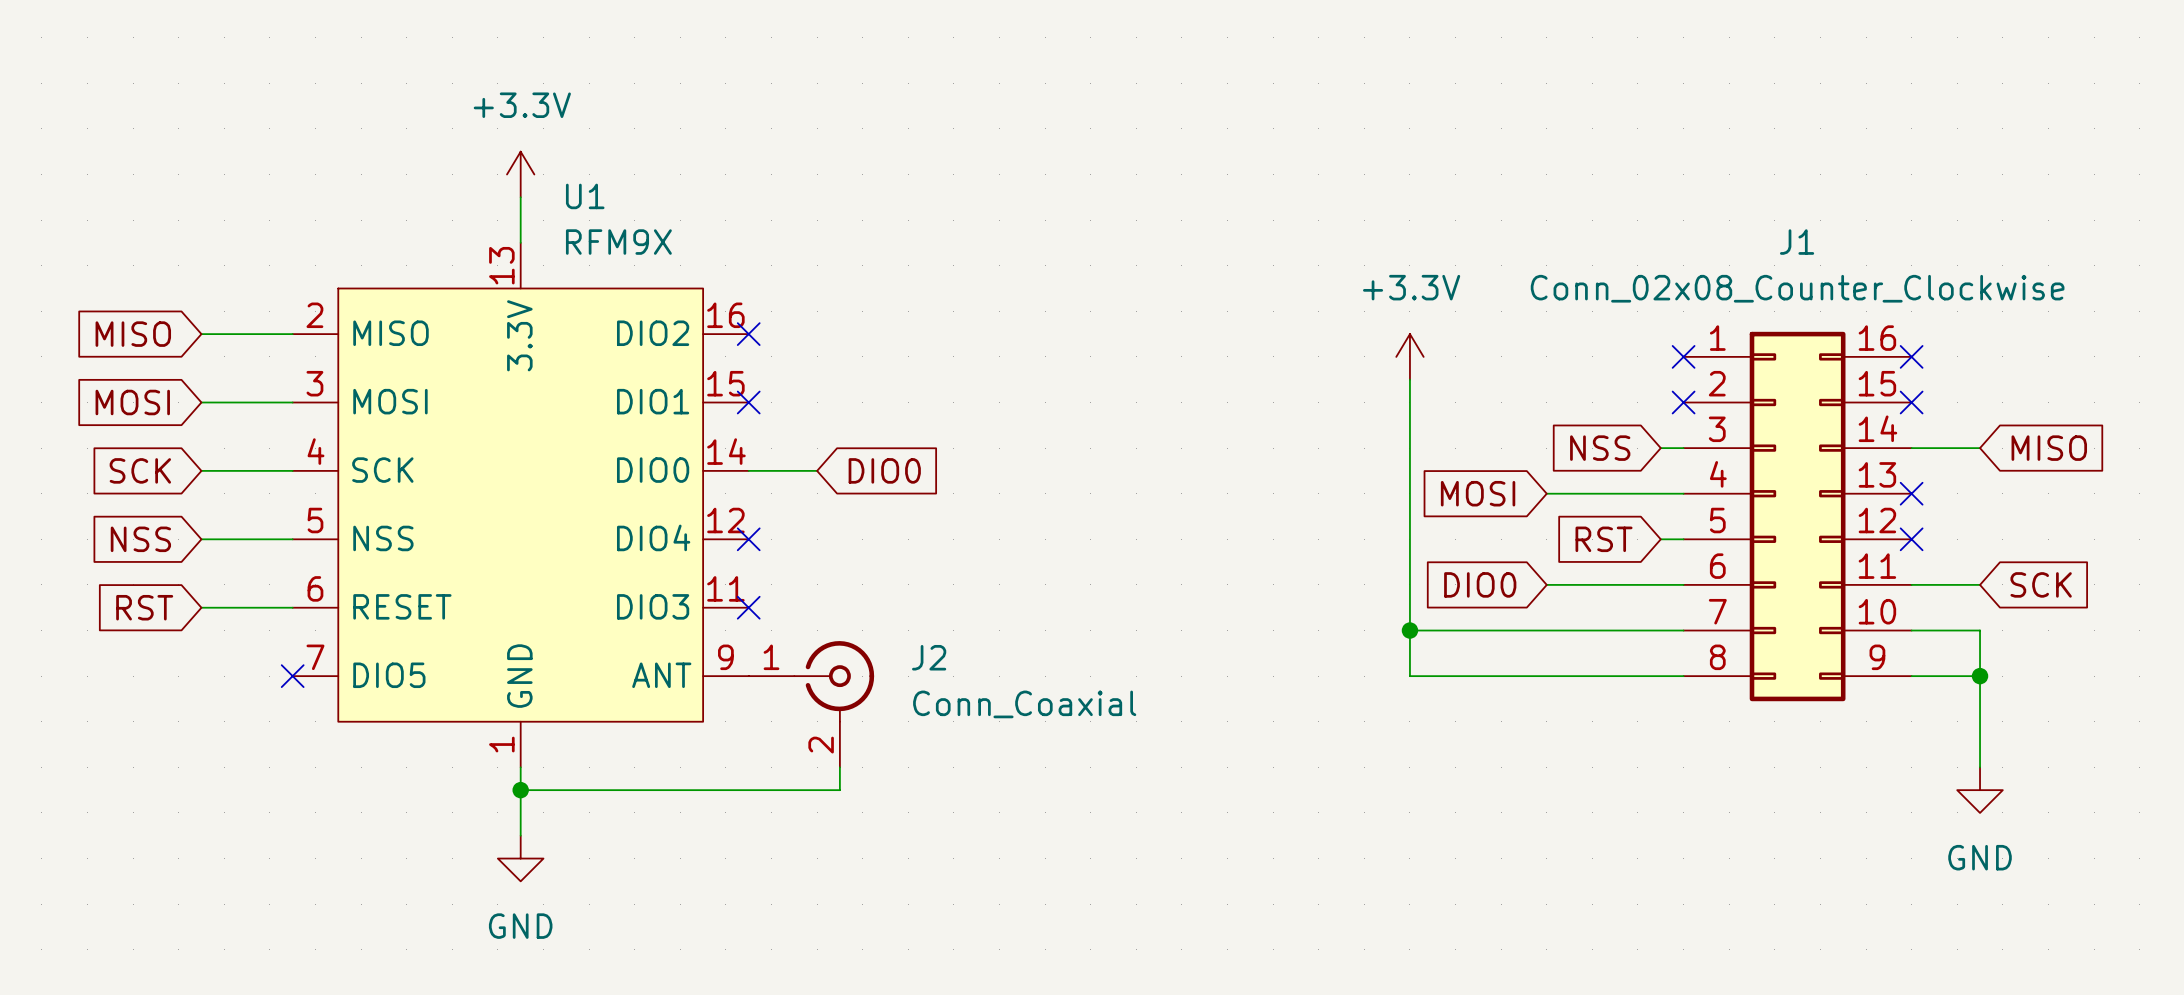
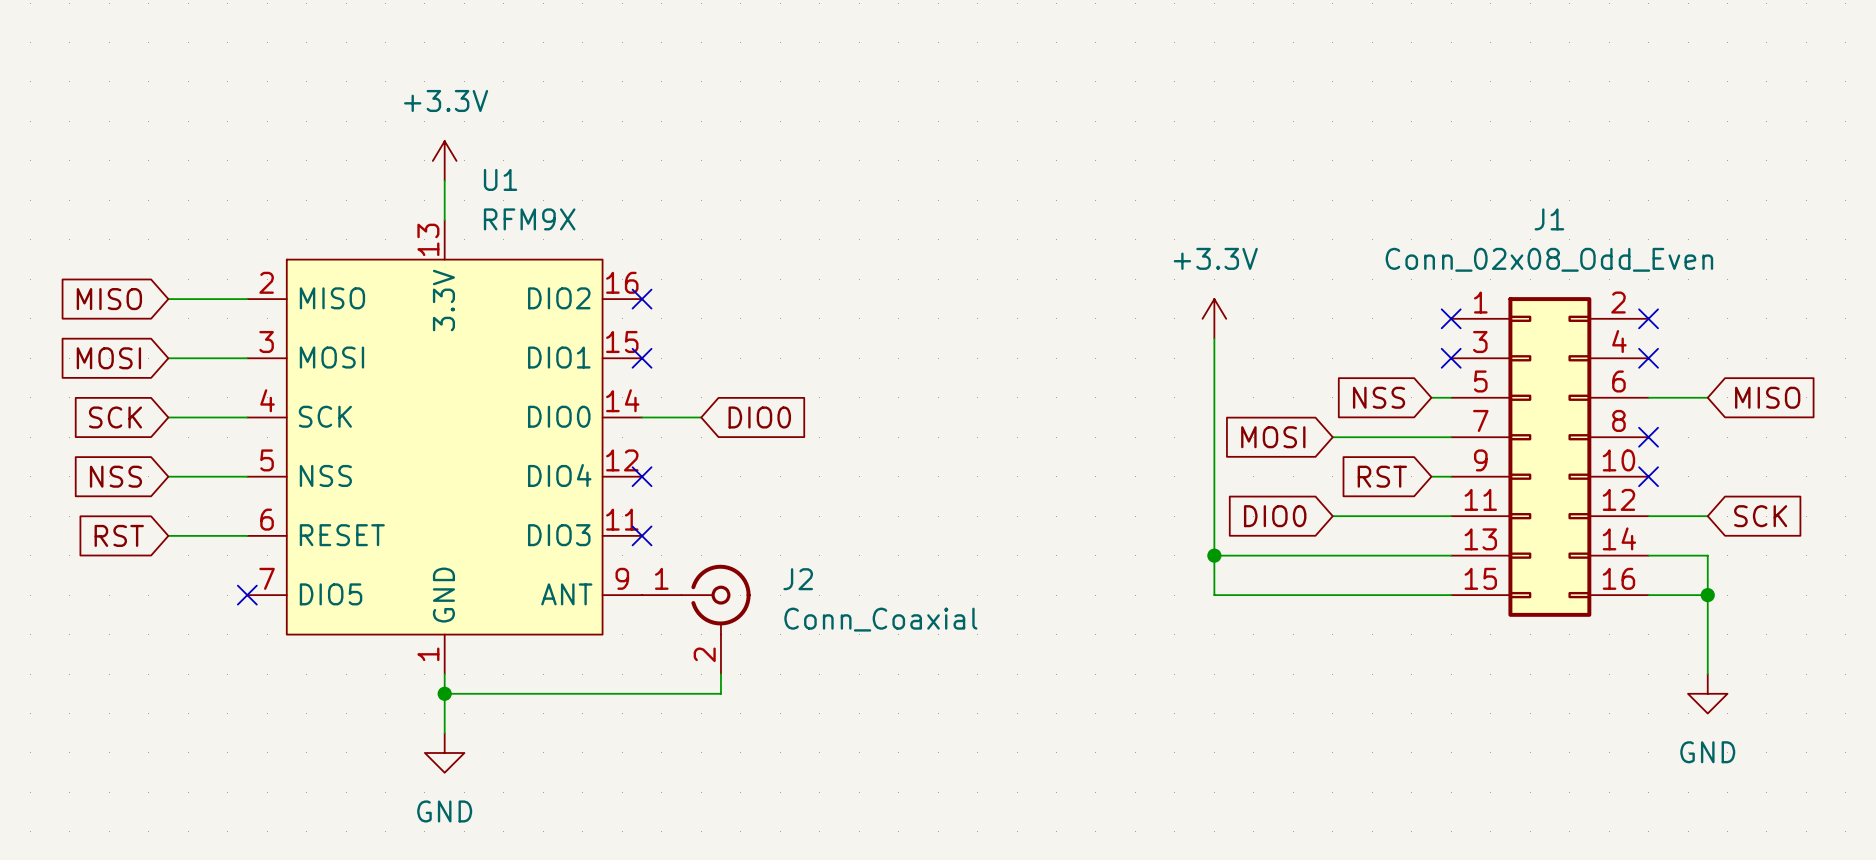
J1 value: Conn_02x08_Counter_Clockwise (1797, 288) -> Conn_02x08_Odd_Even (1549, 259)
J1 symbol: [1683, 331, 1912, 702] -> [1451, 297, 1649, 617]

